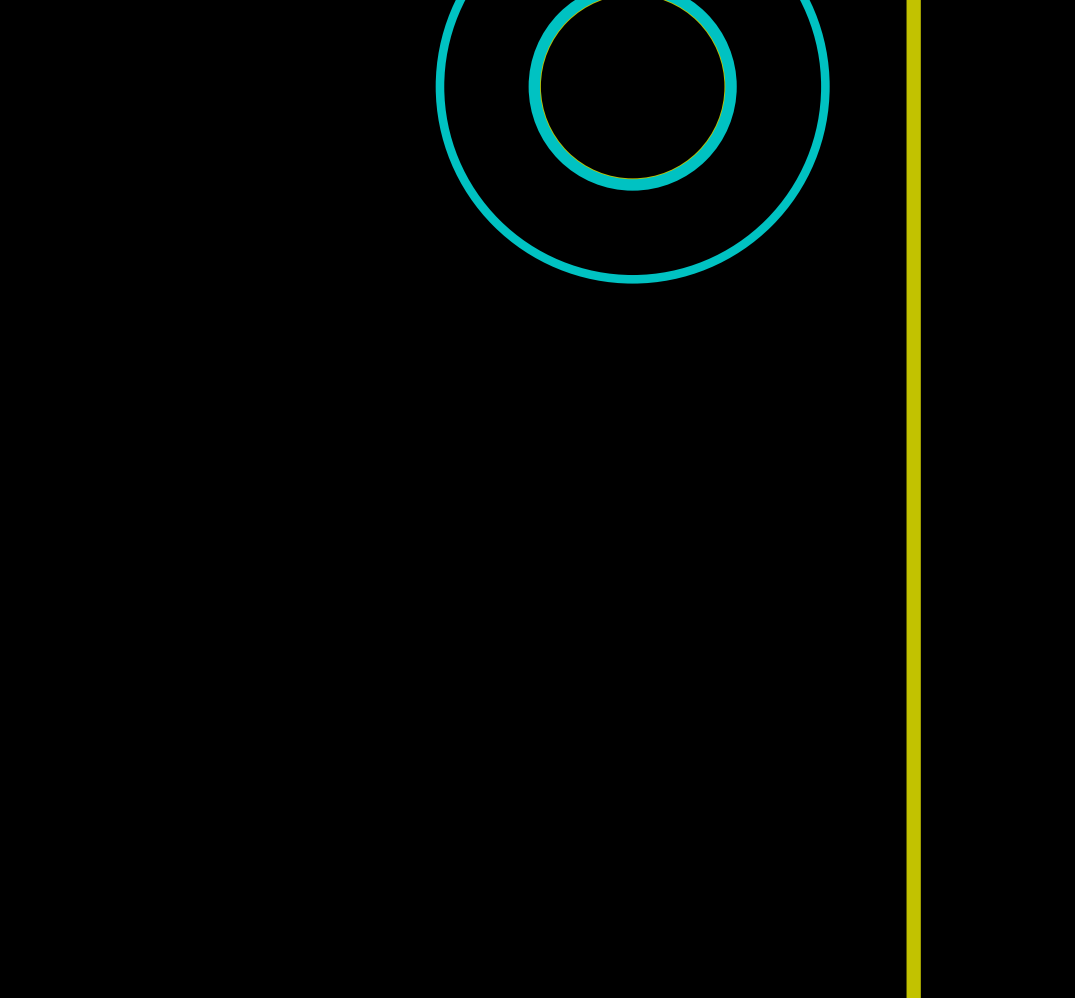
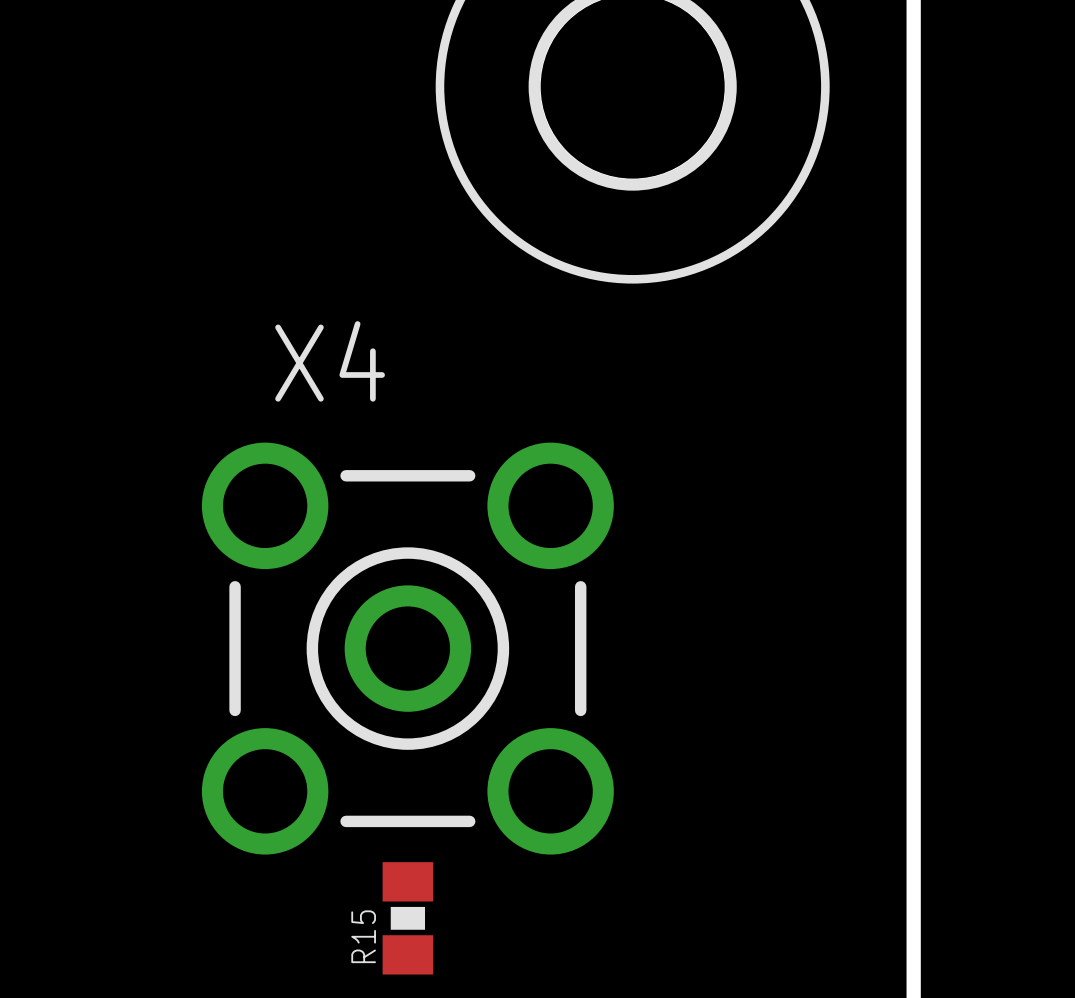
X4: none -> (407, 648)
R15: none -> (407, 918)

